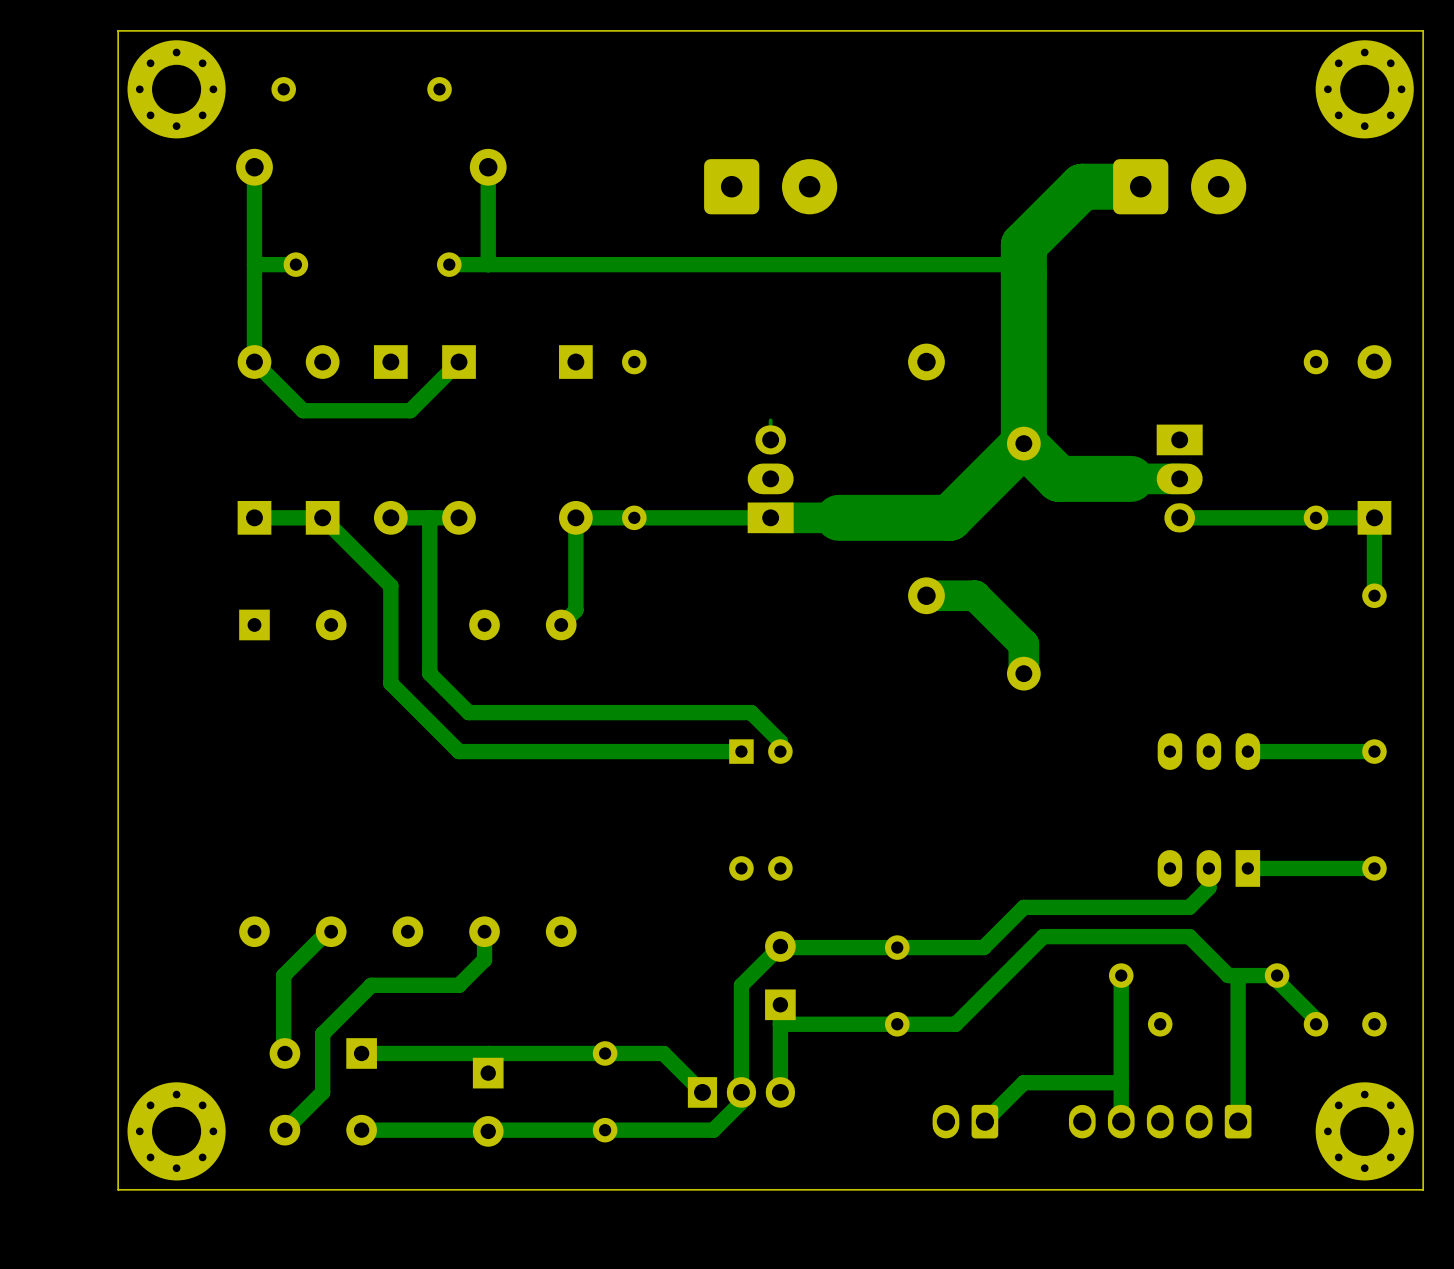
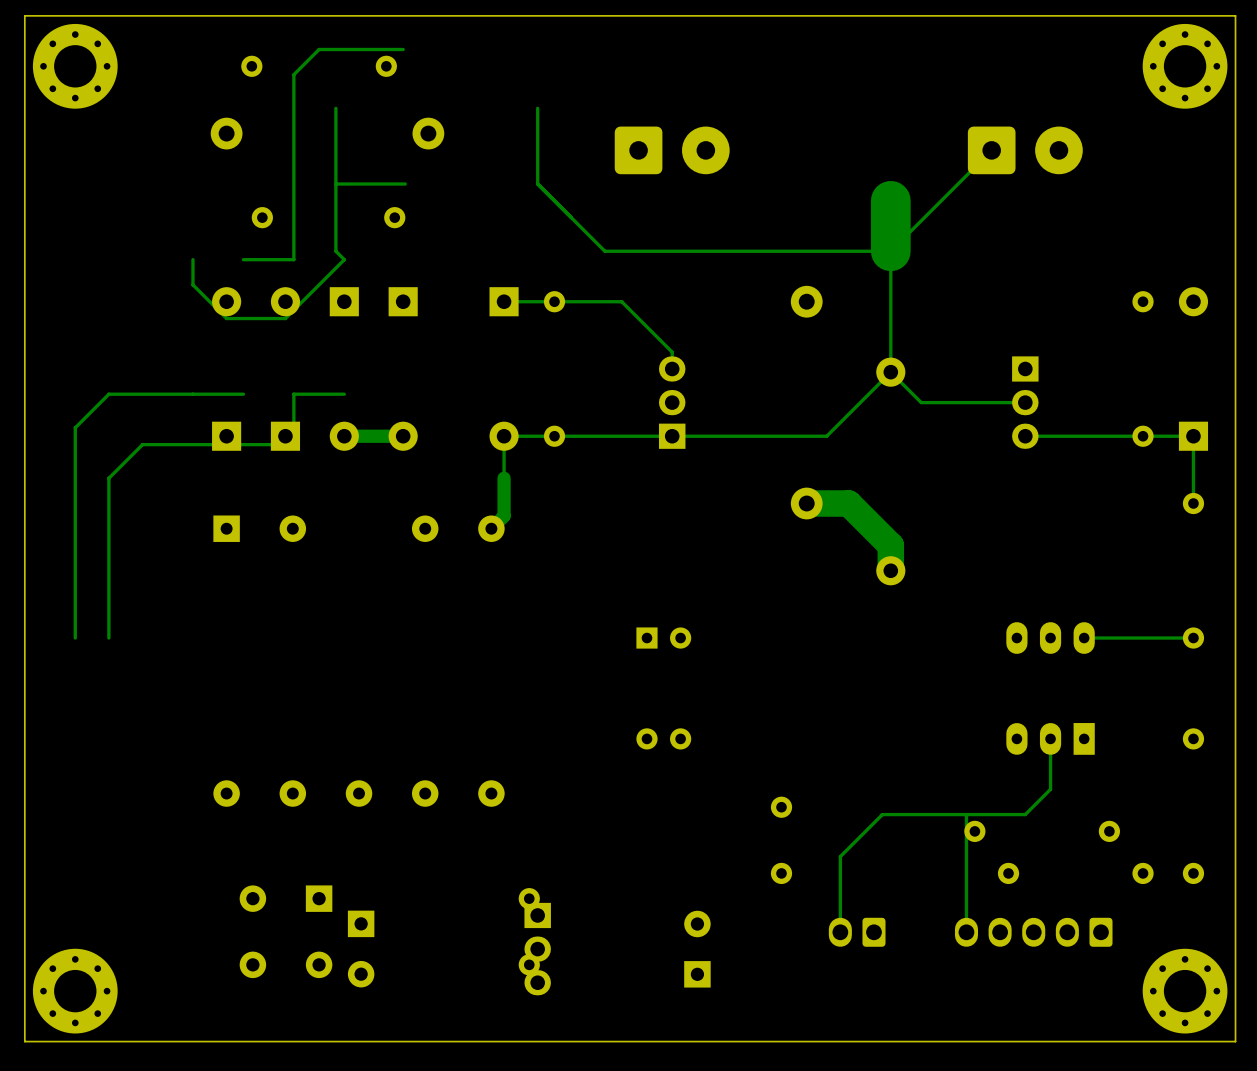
board edge: (118, 30) (118, 1189) (1423, 1189) -> (108, 15) (24, 15) (24, 1041) (1235, 1041) (1235, 1016)
track: none -> (403, 49) (319, 49) (293, 74) (293, 259) (243, 259)
part position: (176, 89) -> (75, 66)
track: none -> (335, 108) (335, 251) (344, 259) (285, 318) (226, 318) (192, 284) (192, 259)
track: (254, 167) (254, 362) (303, 410) (410, 410) (459, 362) -> none
track: (488, 167) (488, 264) -> none
track: (1140, 186) (1082, 186) (1004, 264) (449, 264) -> (991, 150) (890, 251) (604, 251) (537, 184) (537, 108)
track: none -> (405, 184) (335, 184)
track: (295, 264) (254, 264) -> none
track width: thick (1023, 303) (1023, 443) -> thin (890, 251) (890, 372)
track: none -> (504, 301) (621, 301) (672, 352)
part footprint: [1156, 424, 1203, 533] -> [1012, 356, 1039, 449]
part footprint: [747, 425, 794, 534] -> [658, 356, 686, 449]
track width: thick (1023, 443) (949, 517) (575, 517) (575, 566) -> thin (890, 372) (826, 436) (504, 436) (504, 478)
track width: thick (1023, 443) (1059, 478) (1179, 478) -> thin (890, 372) (921, 402) (1025, 402)
track: none -> (243, 394) (108, 394) (75, 427) (75, 638)
track: none -> (344, 394) (293, 394) (293, 436) (285, 444) (142, 444) (108, 478) (108, 638)
track: (254, 517) (322, 517) (390, 586) (390, 683) (459, 751) (741, 751) -> none
track: (429, 517) (429, 673) (468, 712) (751, 712) (780, 741) (780, 751) -> none
track width: thick (1179, 517) (1374, 517) (1374, 595) -> thin (1025, 436) (1193, 436) (1193, 503)
track width: thick (1374, 751) (1247, 751) -> thin (1193, 638) (1084, 638)
track: (1374, 868) (1247, 868) -> none
track: (1208, 887) (1189, 907) (1023, 907) (983, 947) (780, 946) (741, 985) (741, 1102) (713, 1130) (361, 1130) -> (1050, 755) (1050, 789) (1025, 814) (882, 814) (840, 856) (840, 932)
track: (331, 931) (327, 931) (283, 975) (284, 1053) -> none
track: (484, 931) (484, 959) (459, 985) (371, 985) (322, 1034) (322, 1092) (284, 1130) -> none
track: none -> (966, 814) (966, 932)
part position: (780, 975) -> (697, 949)
track: (1121, 975) (1121, 1121) -> none
track: (1238, 975) (1238, 1121) -> none
track: (780, 1004) (780, 1092) -> none
track: (1316, 1024) (1316, 1019) (1277, 980) (1277, 975) (1228, 975) (1189, 936) (1043, 936) (955, 1024) (780, 1024) -> none
track: (361, 1053) (663, 1053) (702, 1092) -> none
track: (1121, 1082) (1023, 1082) (984, 1121) -> none
part rotation: 0° (741, 1092) -> 90° clockwise (537, 949)
part position: (741, 1092) -> (537, 949)
part position: (488, 1102) -> (361, 949)
part position: (965, 1121) -> (857, 932)
part position: (1160, 1121) -> (1033, 932)
part position: (176, 1131) -> (75, 991)
part position: (1364, 1131) -> (1185, 991)

